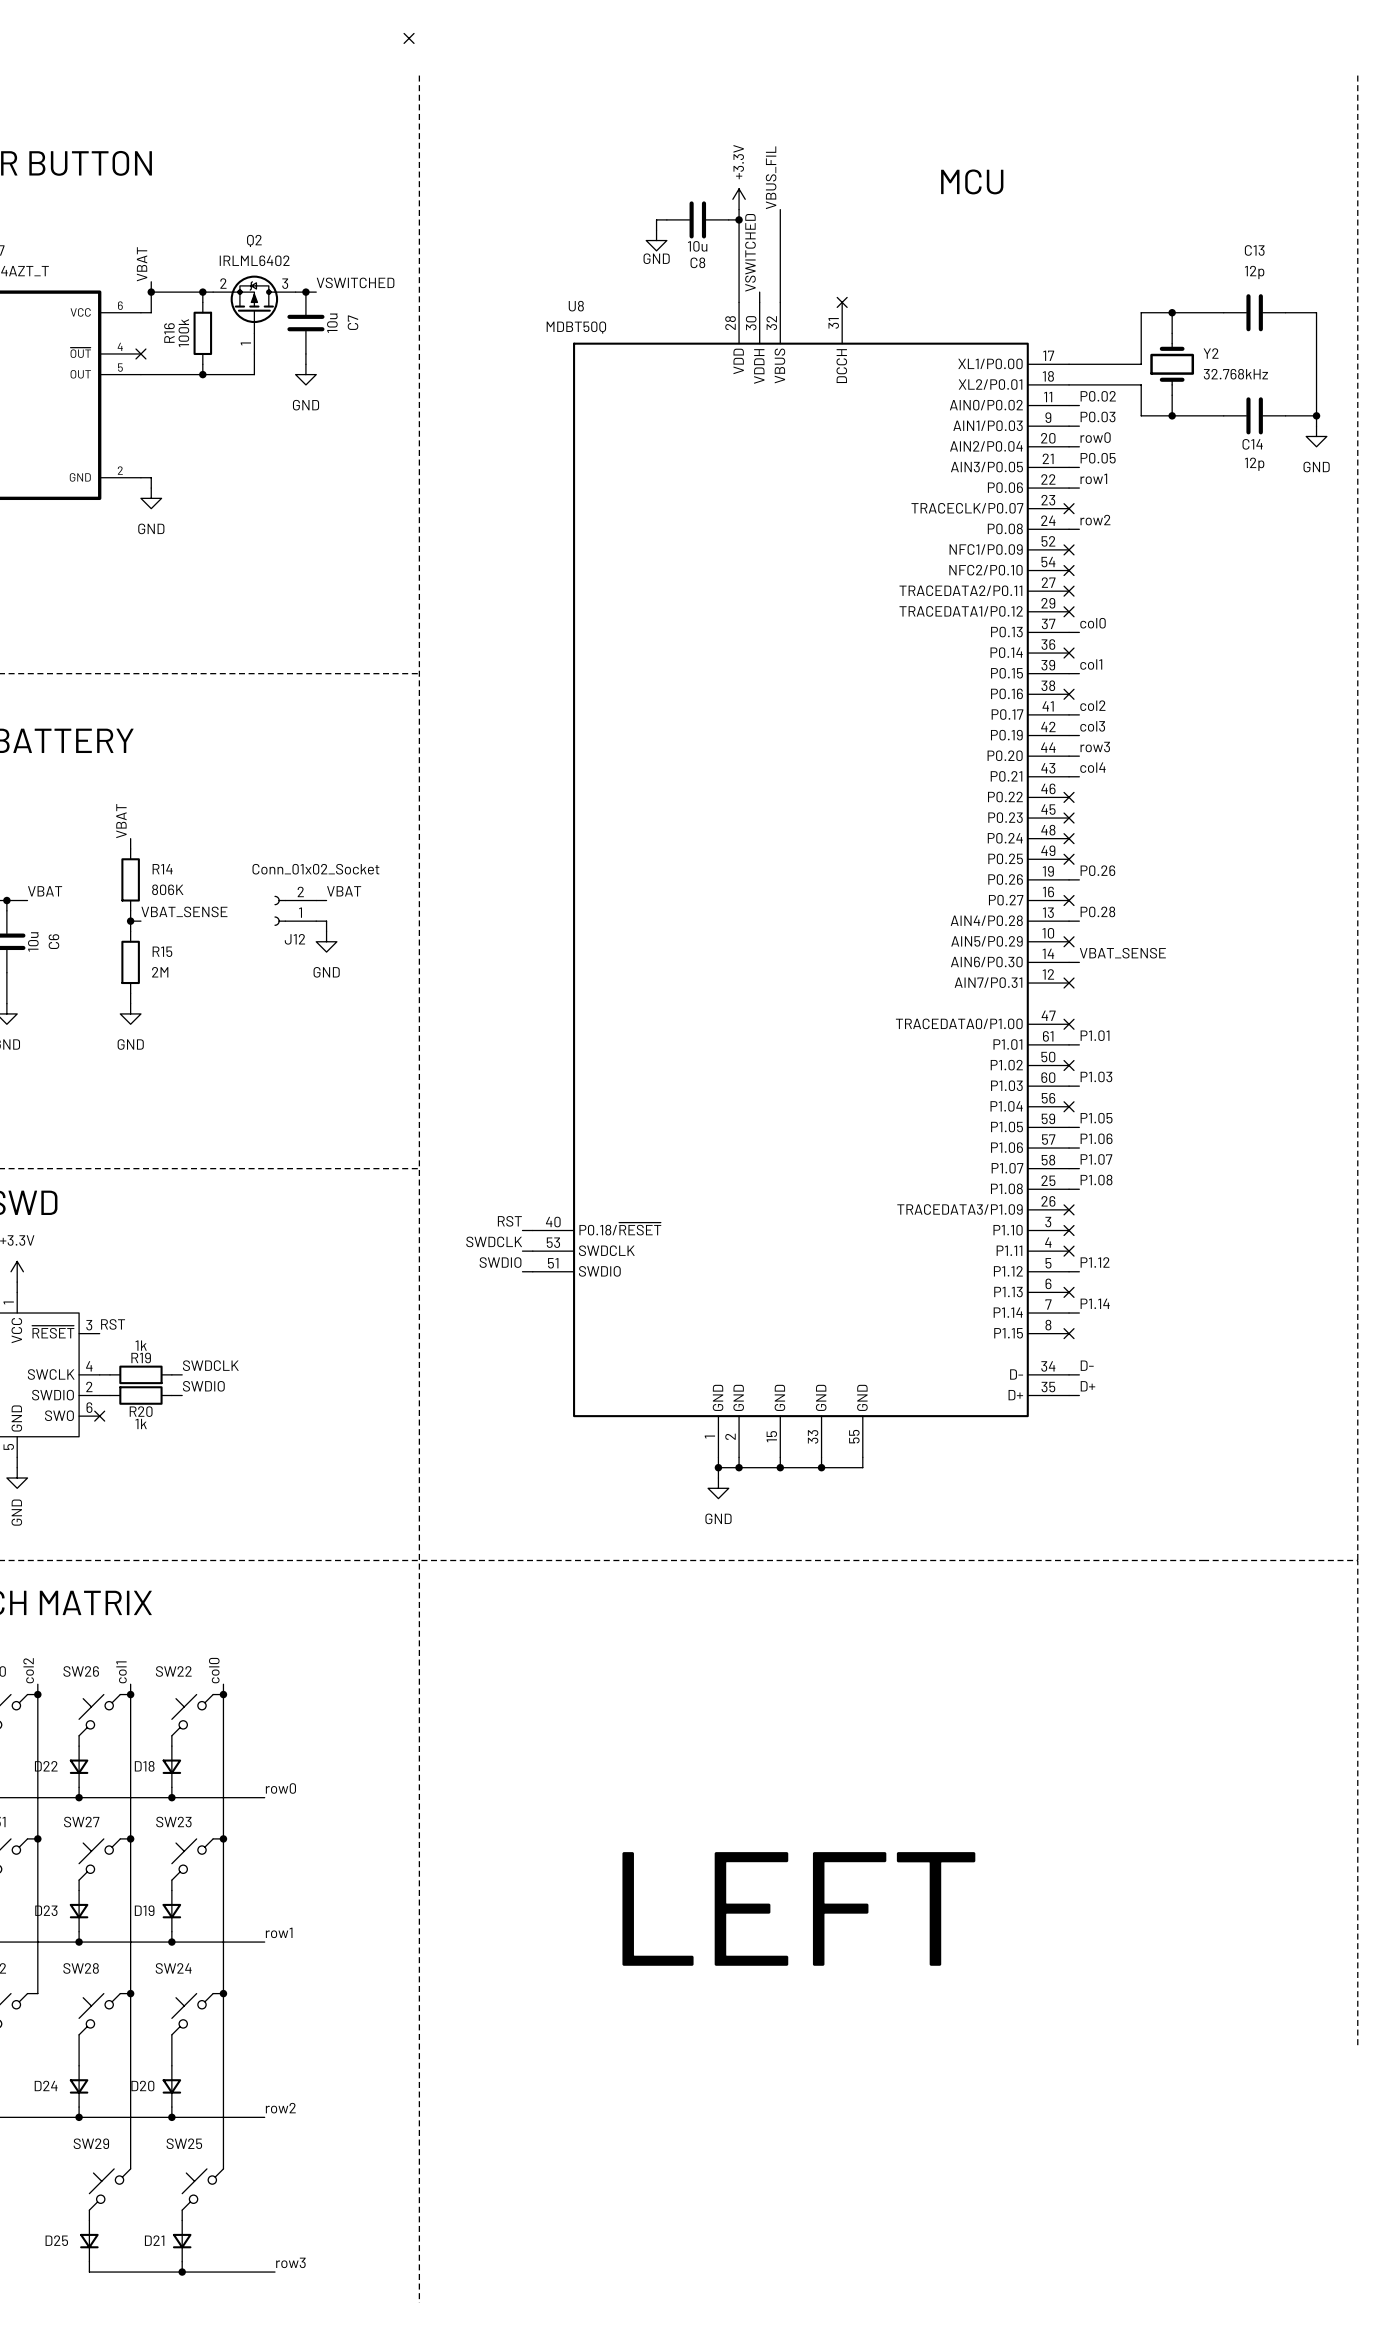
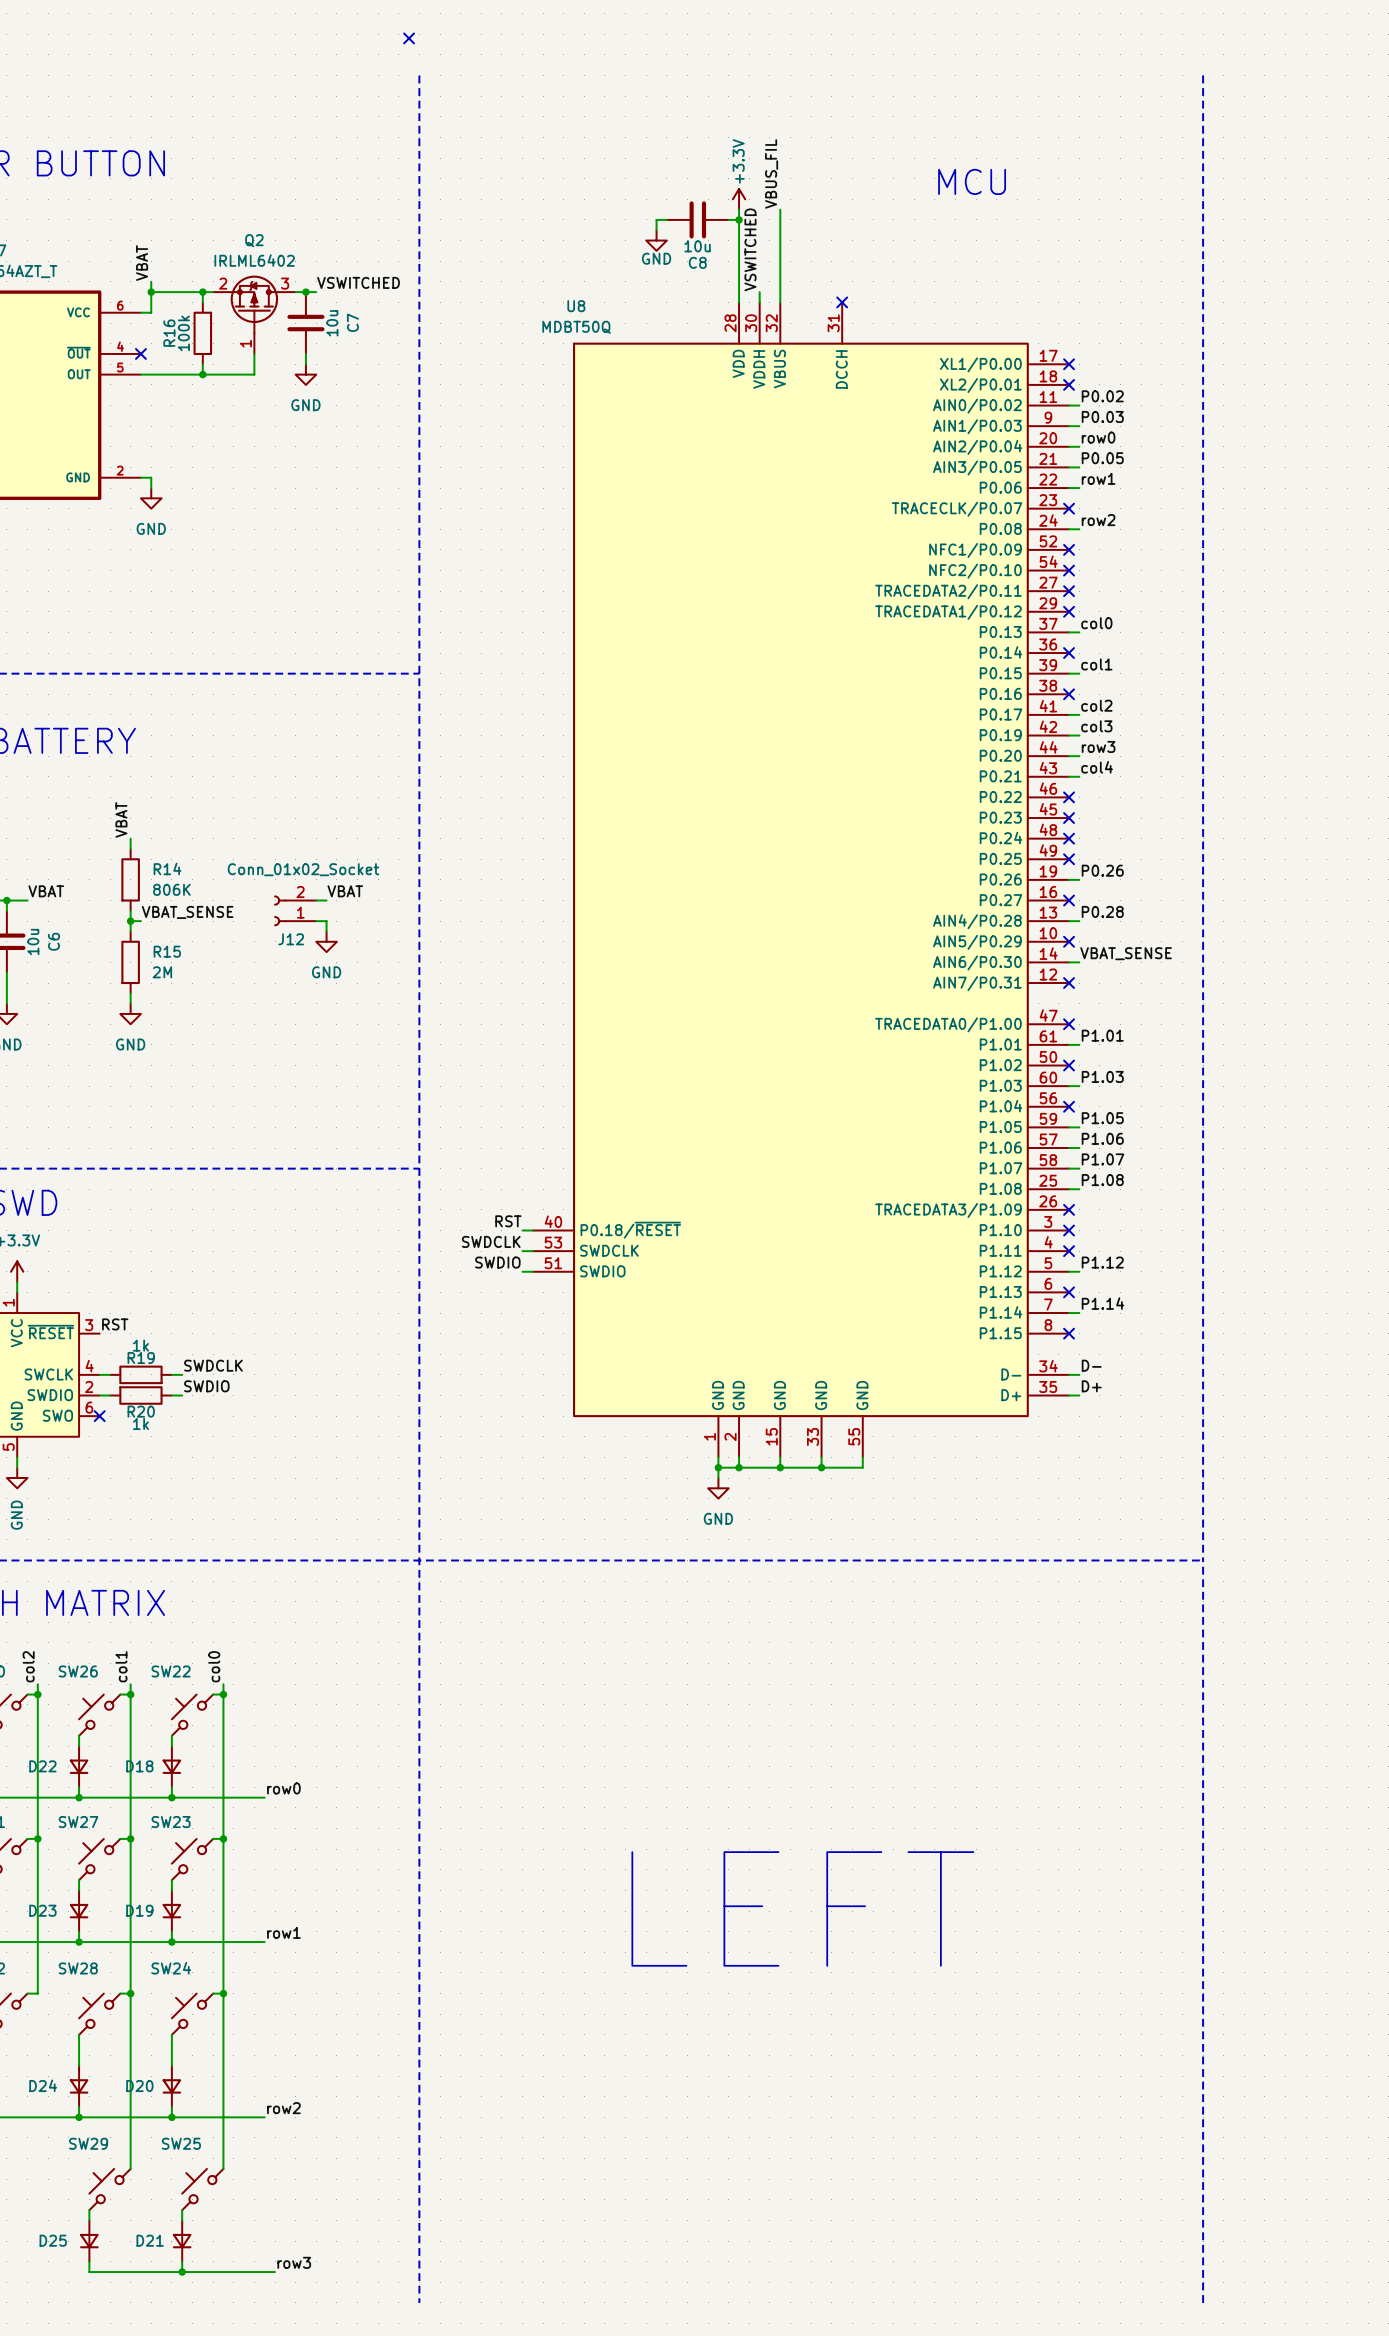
line: none -> (1203, 75) (1203, 2302)
line: (1357, 75) (1357, 2045) -> none
wire: (1172, 312) (1172, 333) -> none
junction: (1172, 312) -> none
wire: (1223, 312) (1141, 312) (1141, 364) (1069, 364) -> none
C13: 12p (1254, 312) -> none
wire: (1285, 312) (1316, 312) (1316, 426) -> none
no-connect mark: none -> (1069, 364)
Y2: 32.768kHz (1172, 364) -> none
wire: (1069, 384) (1141, 384) (1141, 415) (1223, 415) -> none
no-connect mark: none -> (1069, 384)
wire: (1172, 395) (1172, 415) -> none
junction: (1172, 415) -> none
C14: 12p (1254, 415) -> none
wire: (1285, 415) (1316, 415) -> none
junction: (1316, 415) -> none
power symbol: GND (1316, 436) -> none
line: (1203, 1560) (1357, 1560) -> none

